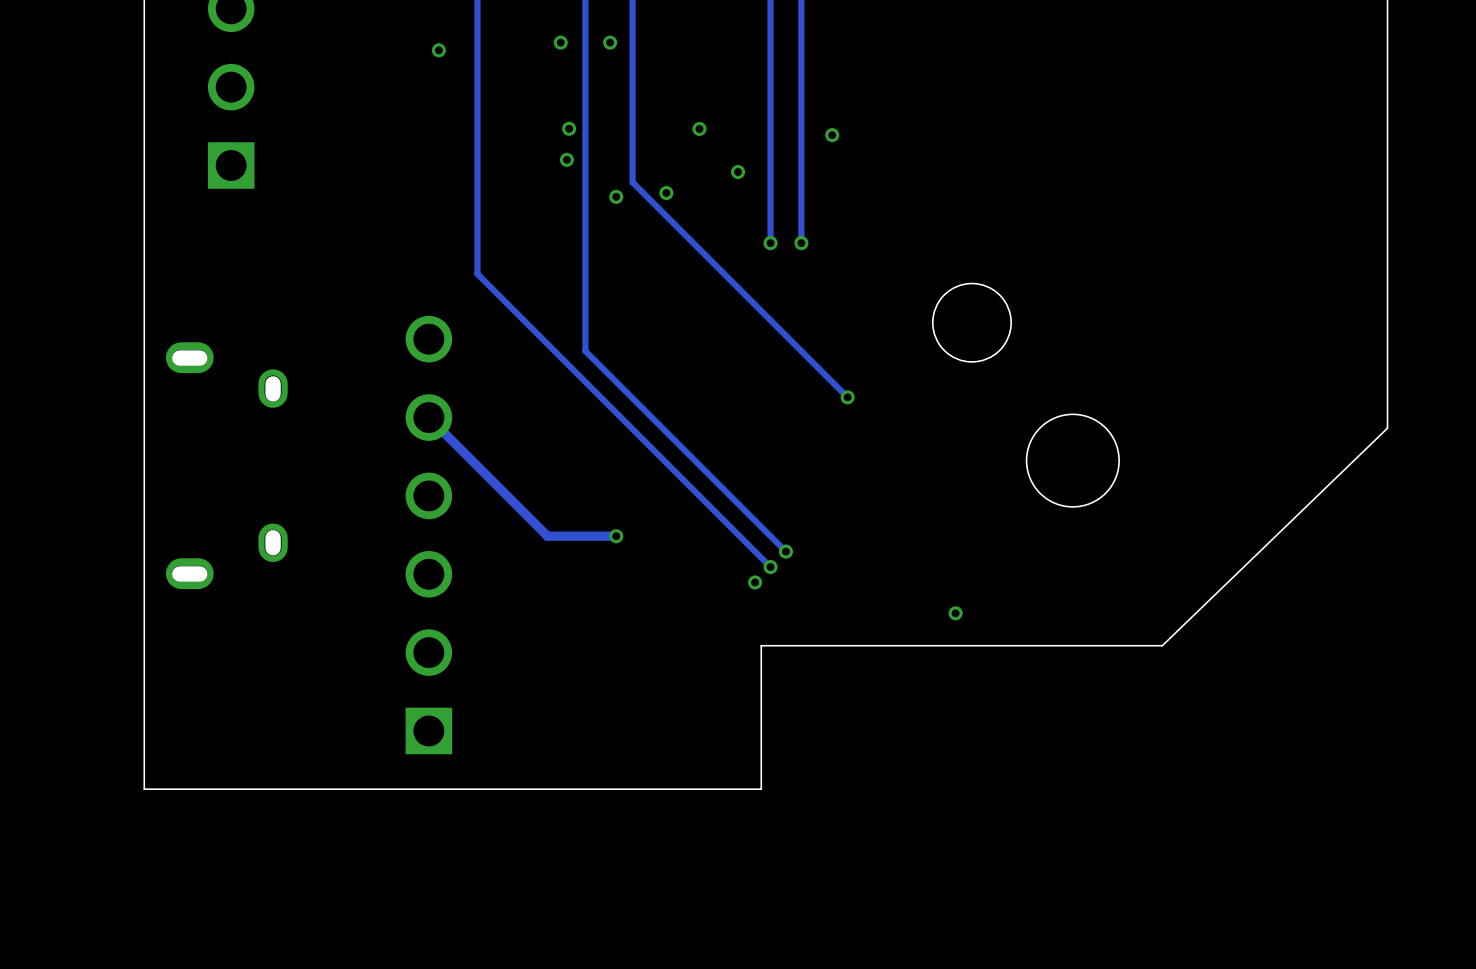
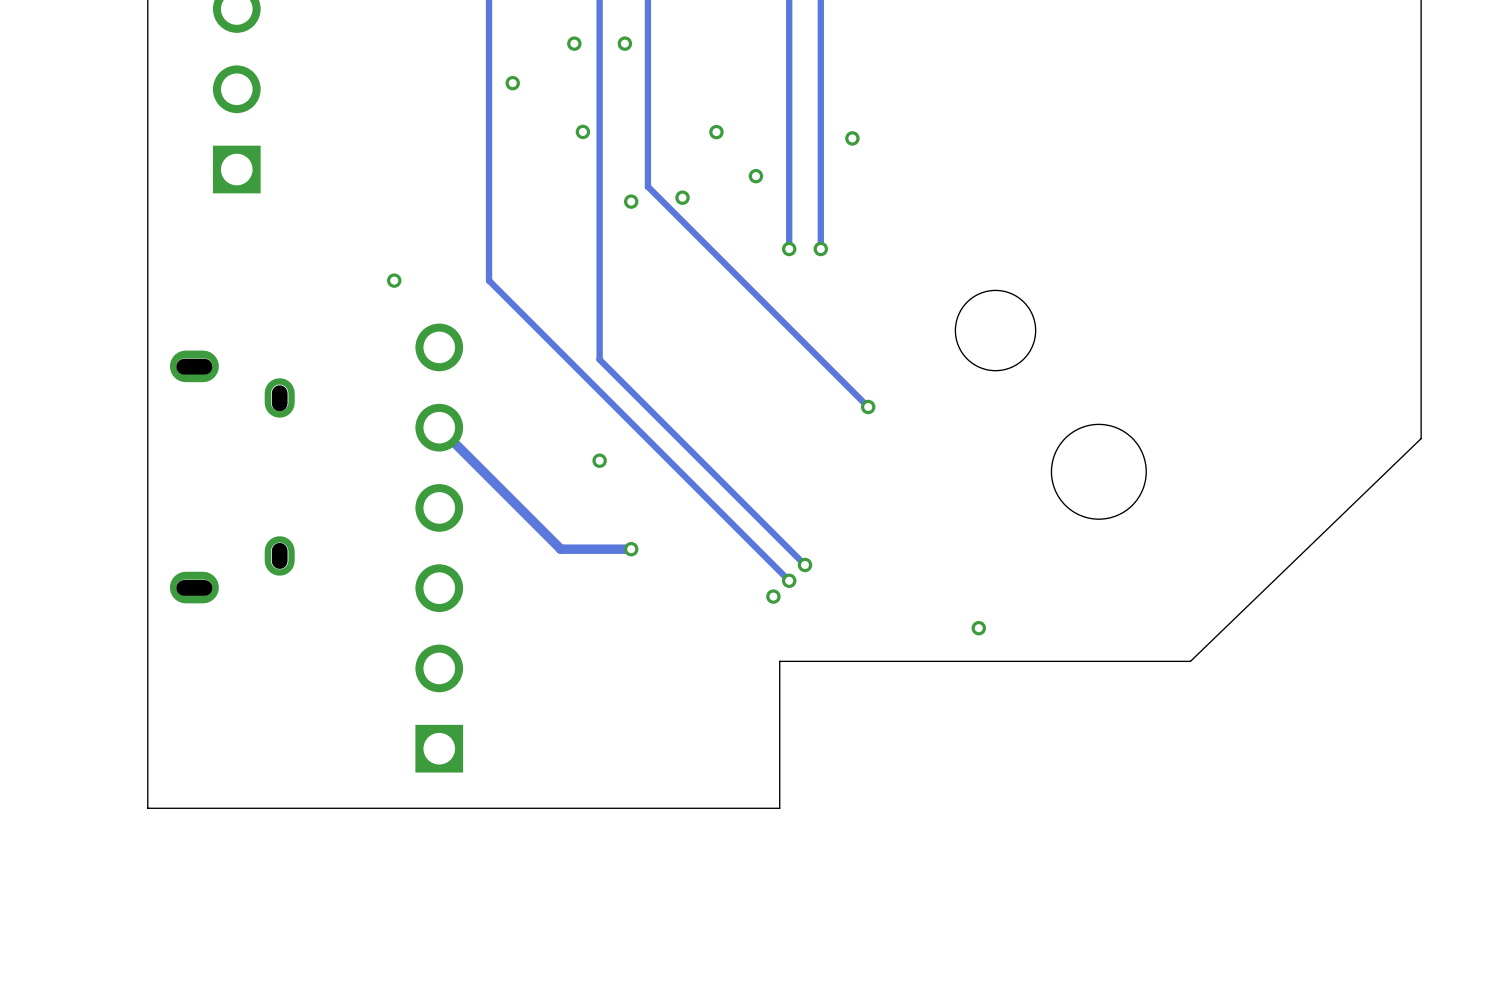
via: (438, 50) -> none
via: none -> (512, 83)
via: (566, 159) -> none
via: none -> (394, 280)
part: none -> (599, 460)

